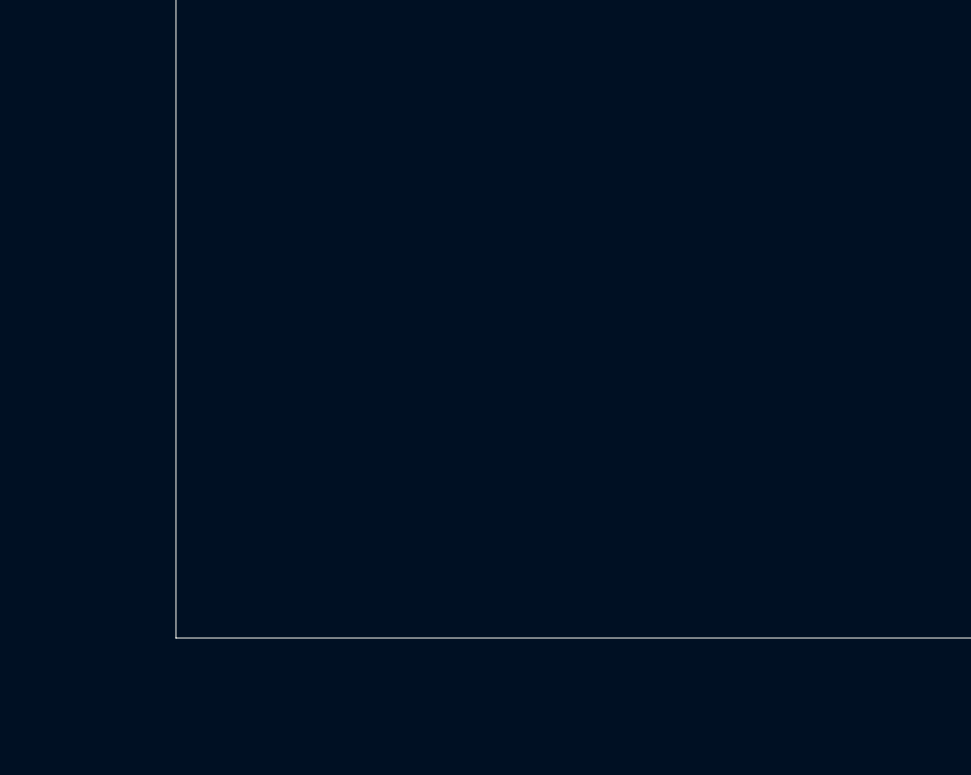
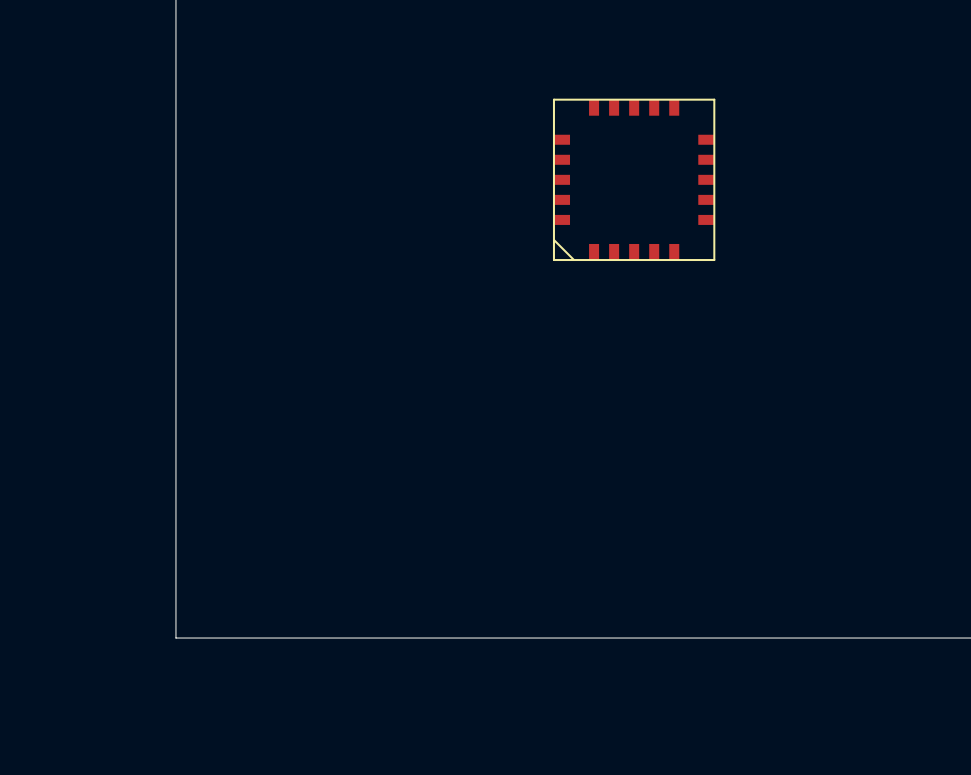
part: none -> (634, 179)

